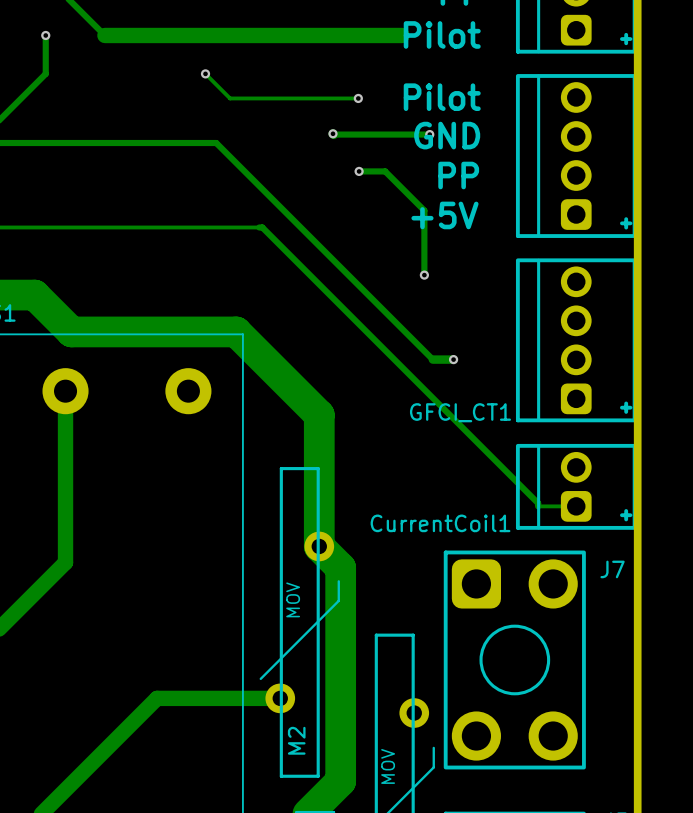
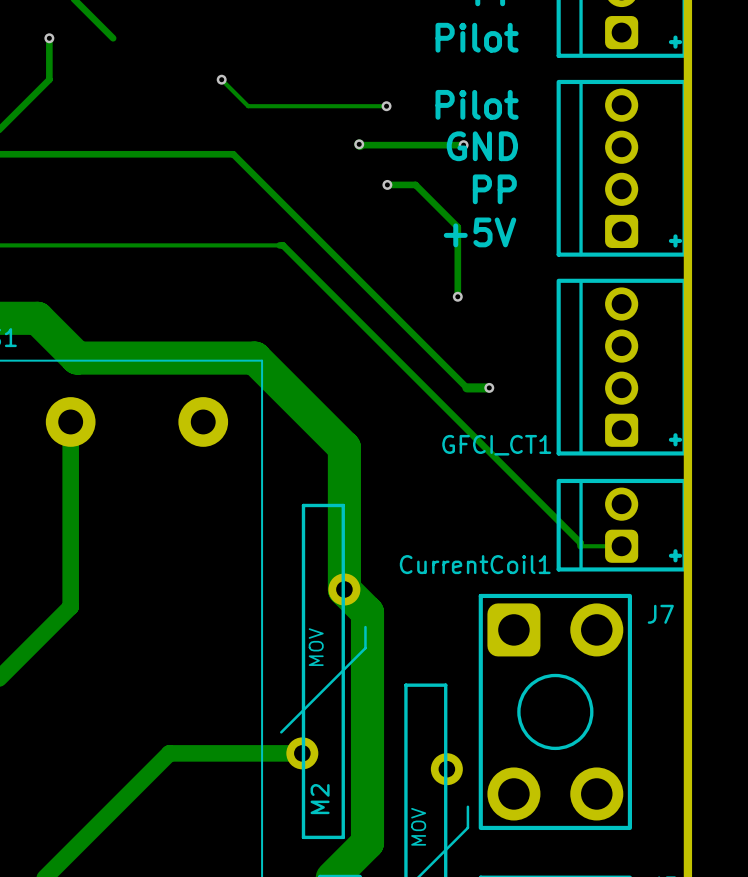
track: (402, 35) (104, 35) -> none

